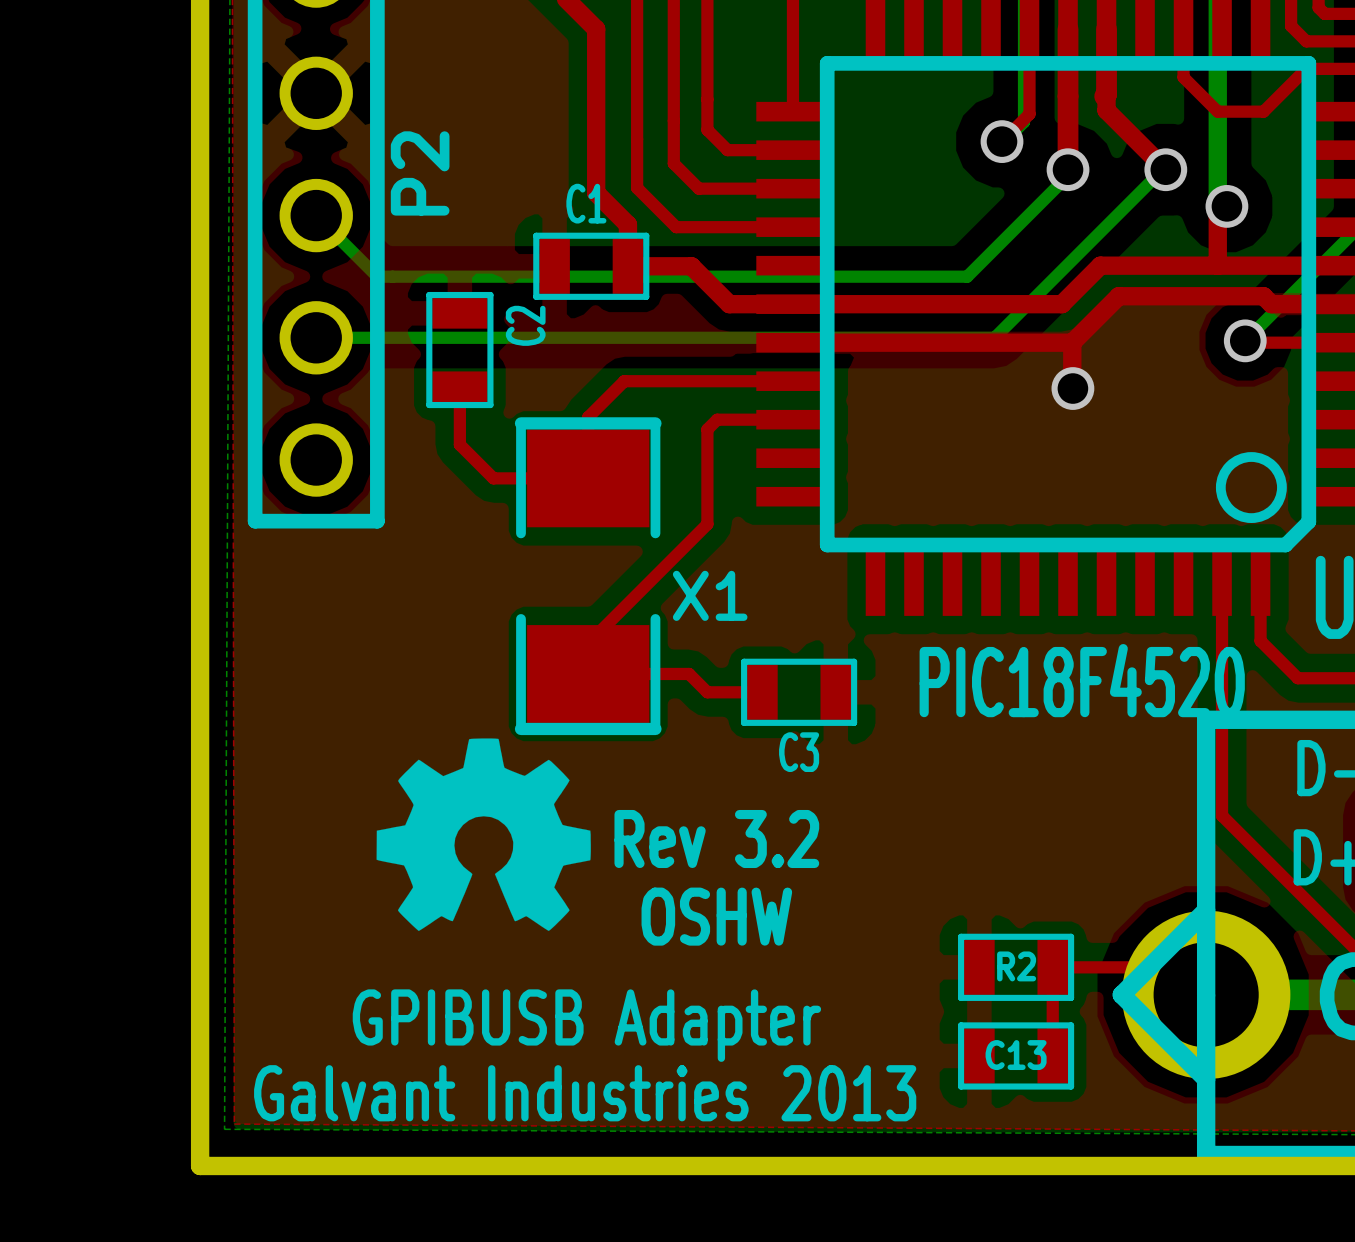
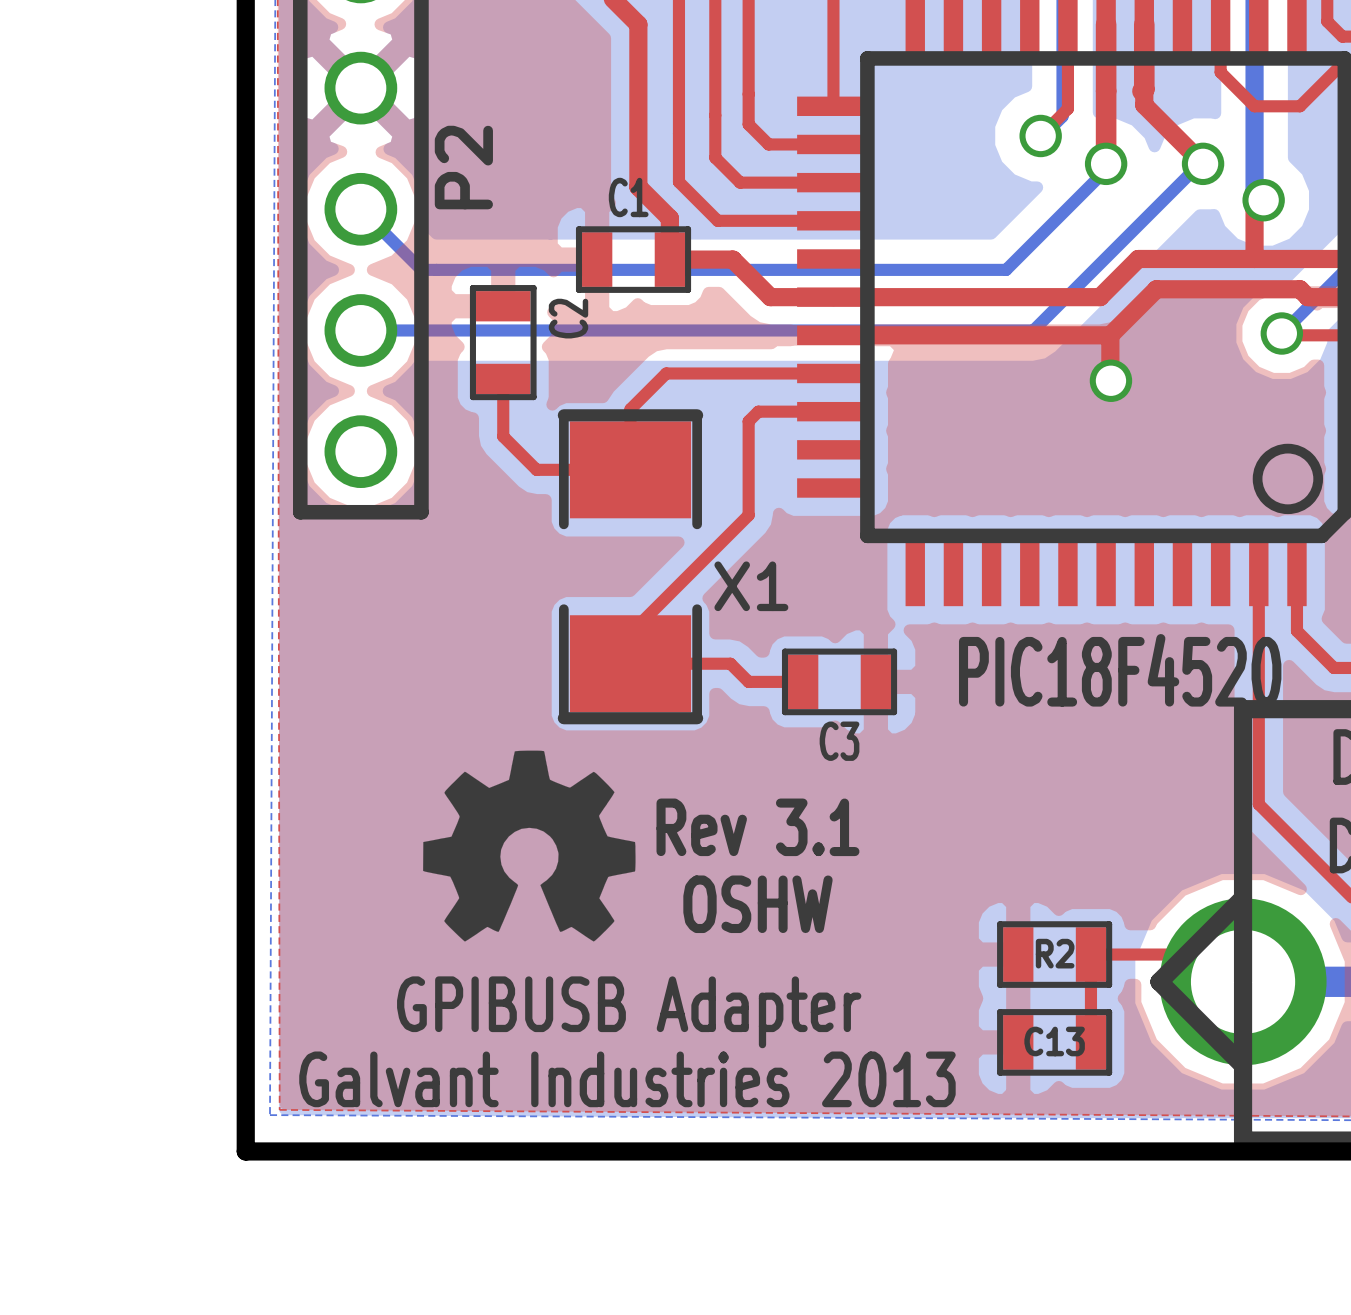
drawing position: (483, 834) -> (529, 846)
text: Rev 3.2 (716, 838) -> Rev 3.1 (757, 827)

